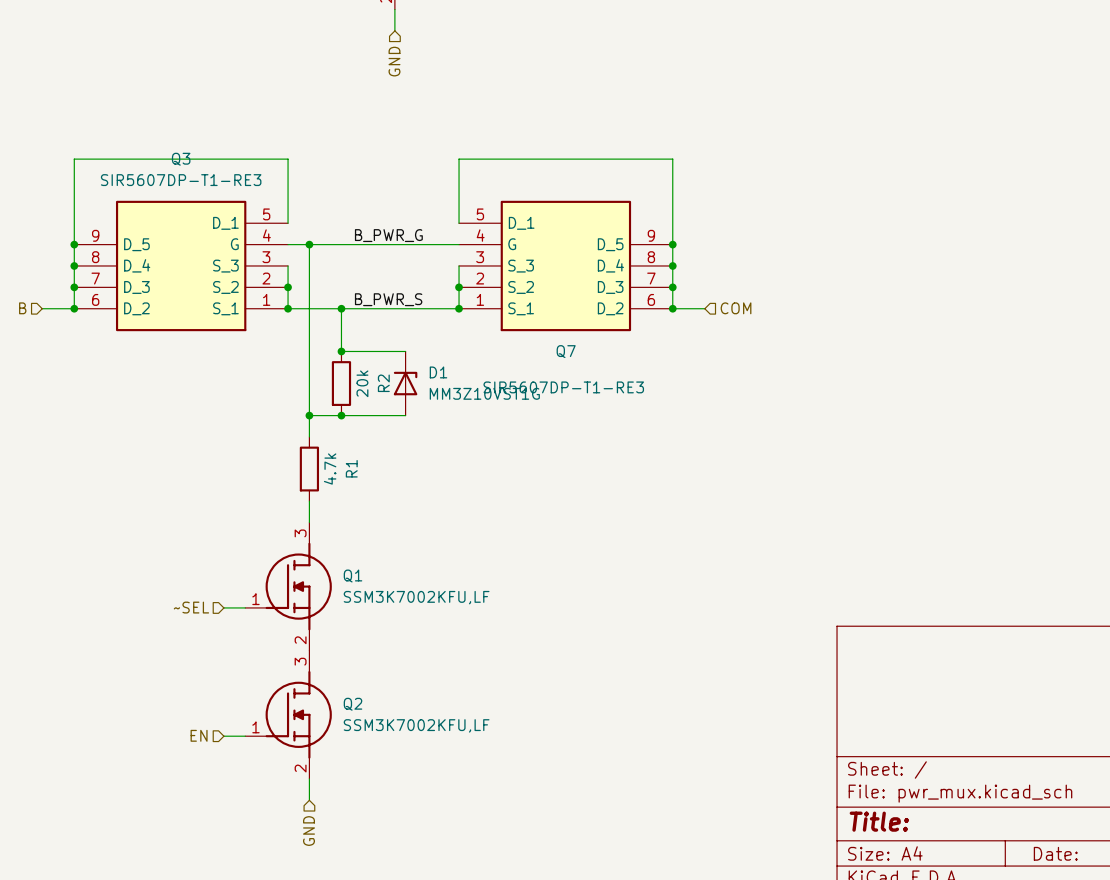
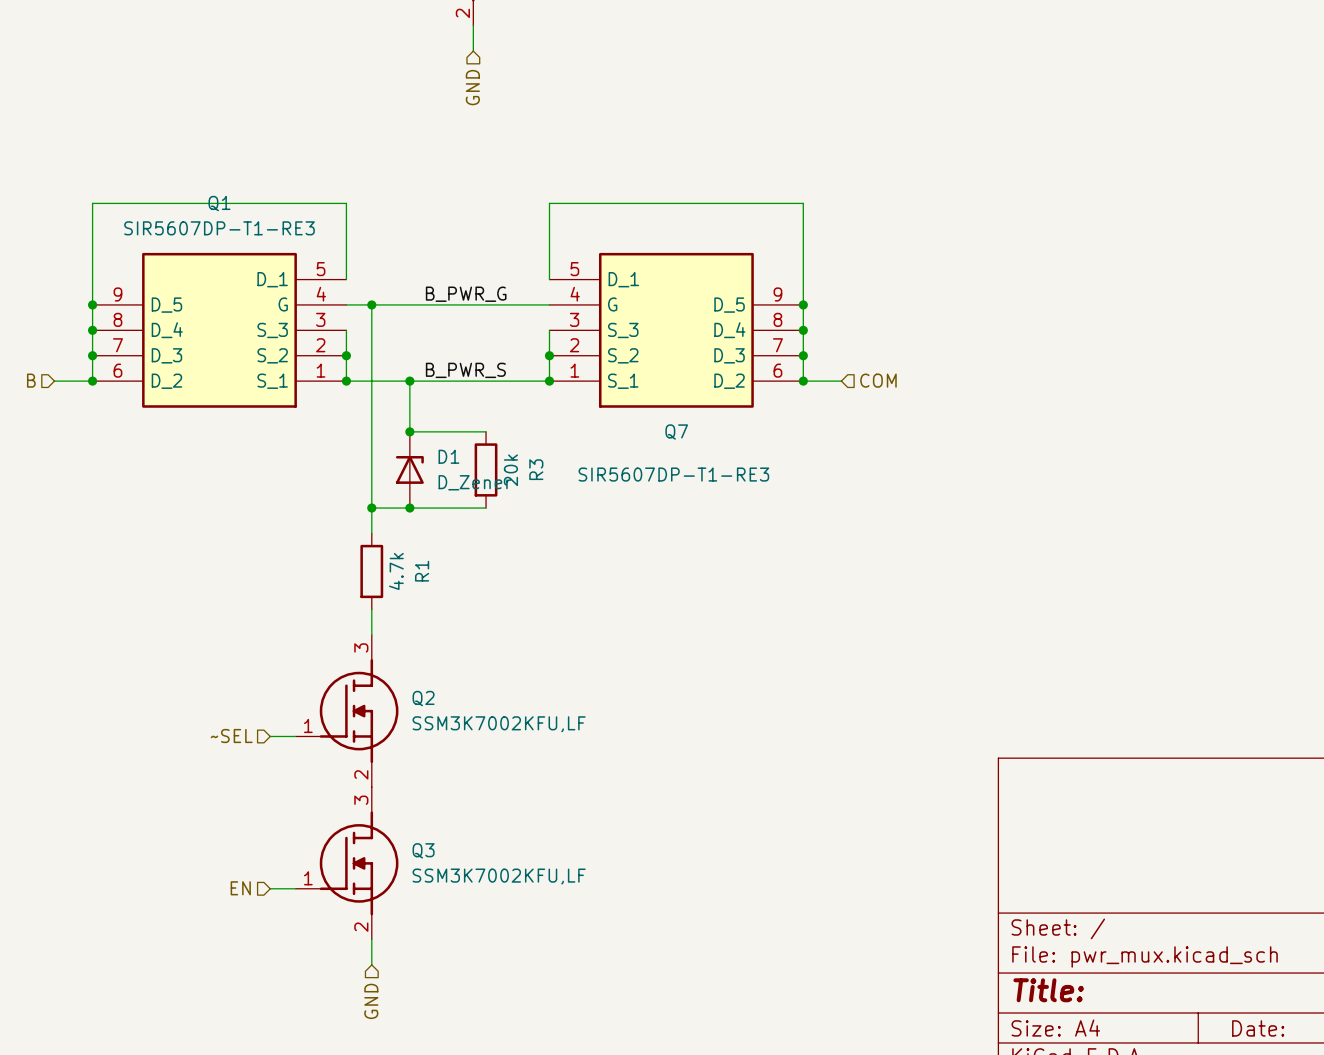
Q3 name: Q3 (181, 159) -> Q1 (219, 203)
R2: 20k (341, 383) -> none
D1 position: (405, 383) -> (409, 469)
R3: none -> 20k (486, 469)
D1 value: MM3Z10VST1G (484, 393) -> D_Zener (474, 482)
Q1 name: Q1 (353, 576) -> Q2 (423, 698)
Q2 name: Q2 (353, 704) -> Q3 (423, 850)

